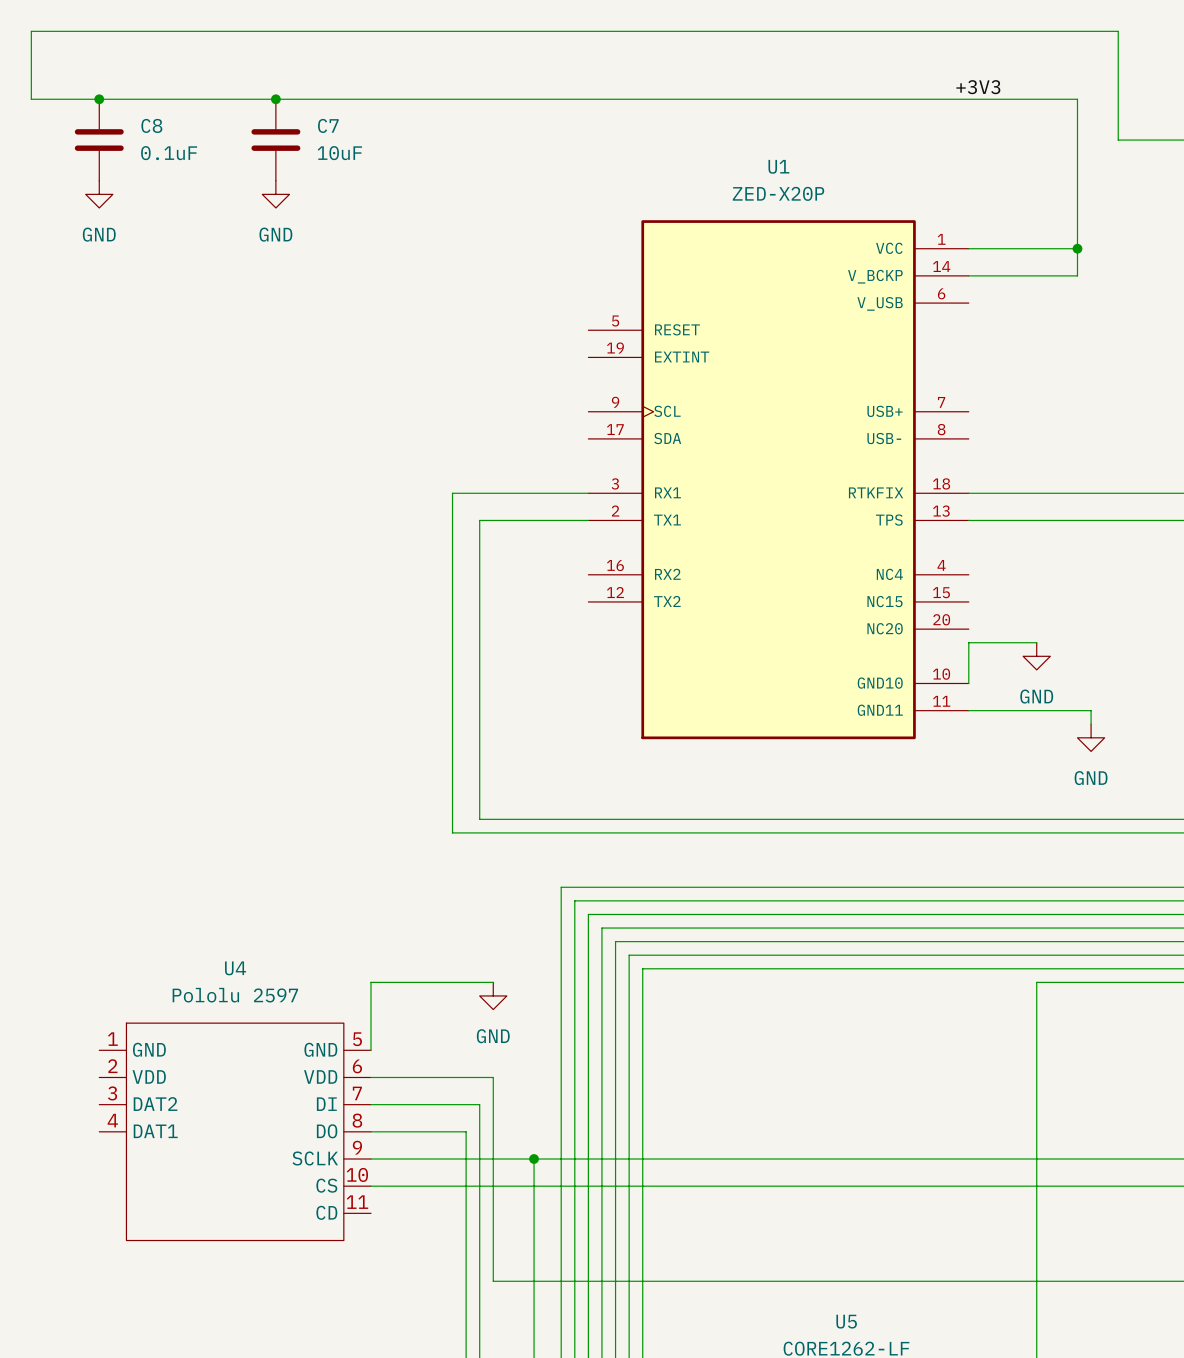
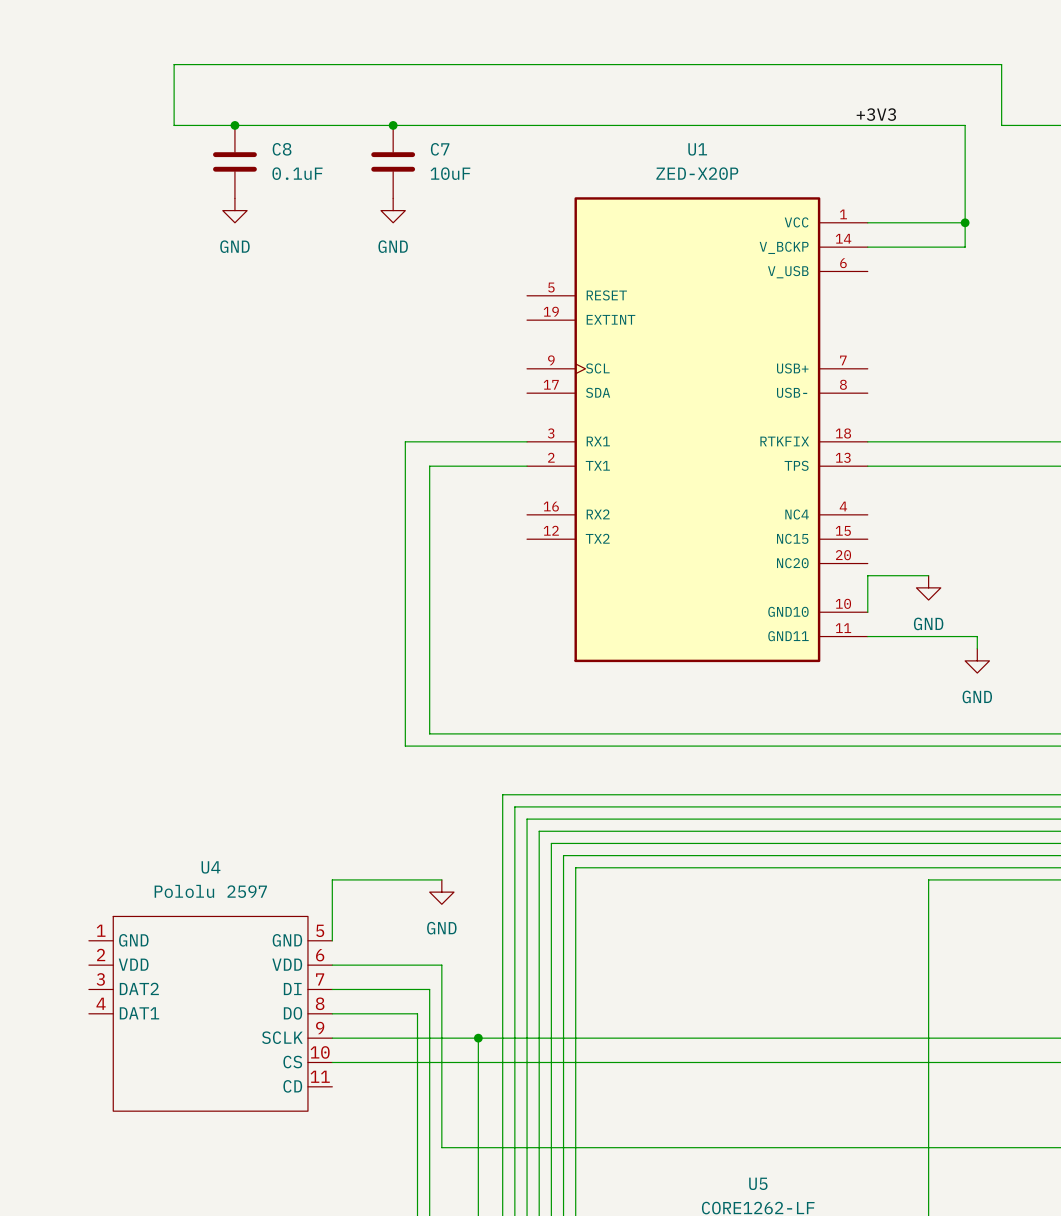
wire: (1118, 72) (1118, 31) (31, 31) (31, 99) (1077, 99) (1077, 140) -> (1001, 64) (174, 64) (174, 125) (965, 125)
label position: +3V3 (978, 87) -> +3V3 (876, 114)
junction: (99, 99) -> none
junction position: (275, 99) -> (234, 125)
C8 position: (99, 140) -> (234, 161)
C7 position: (275, 140) -> (393, 161)
junction: none -> (393, 125)
power symbol: GND (99, 194) -> none
power symbol position: GND (275, 194) -> GND (234, 210)
power symbol: none -> GND (393, 210)

